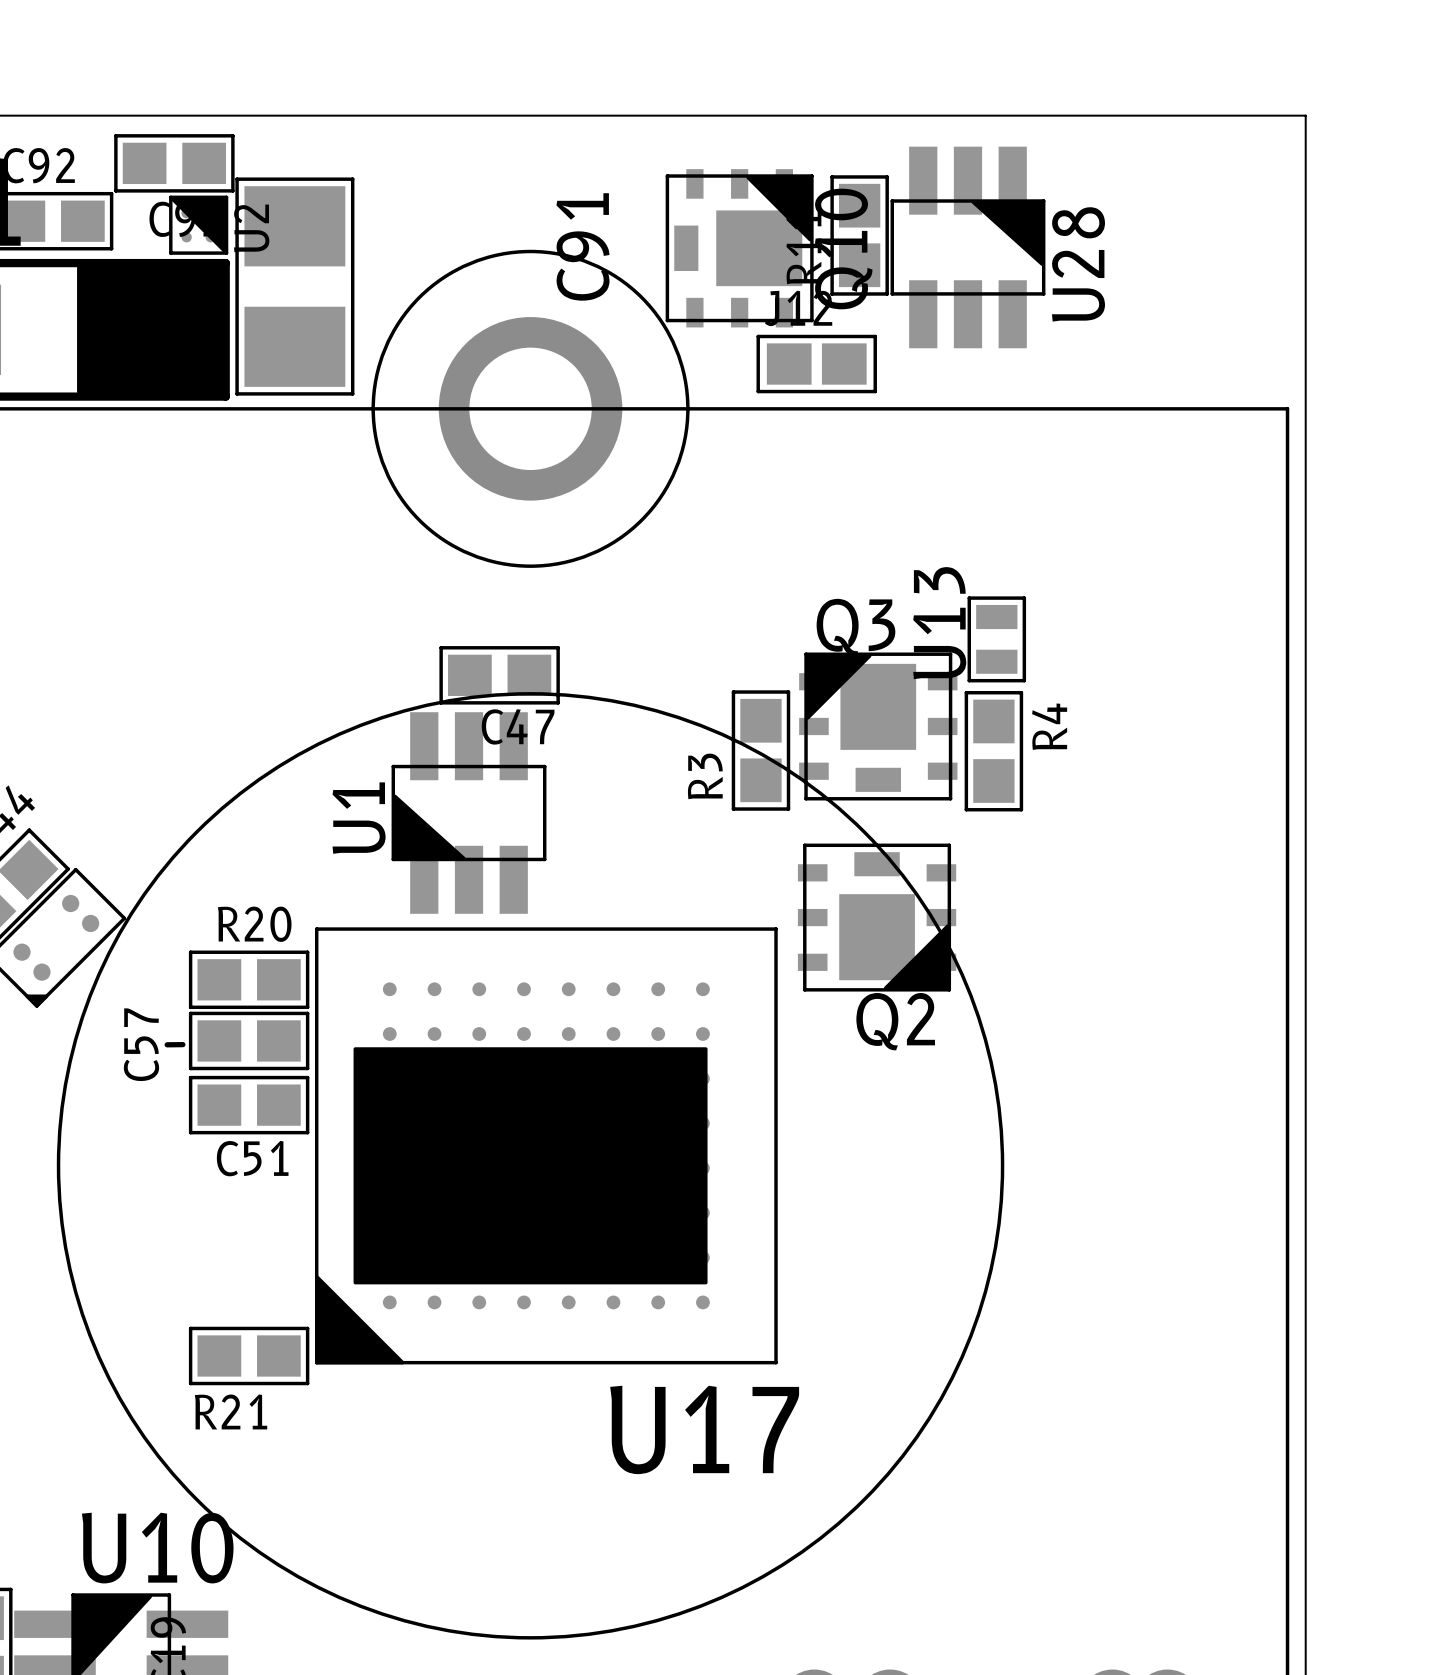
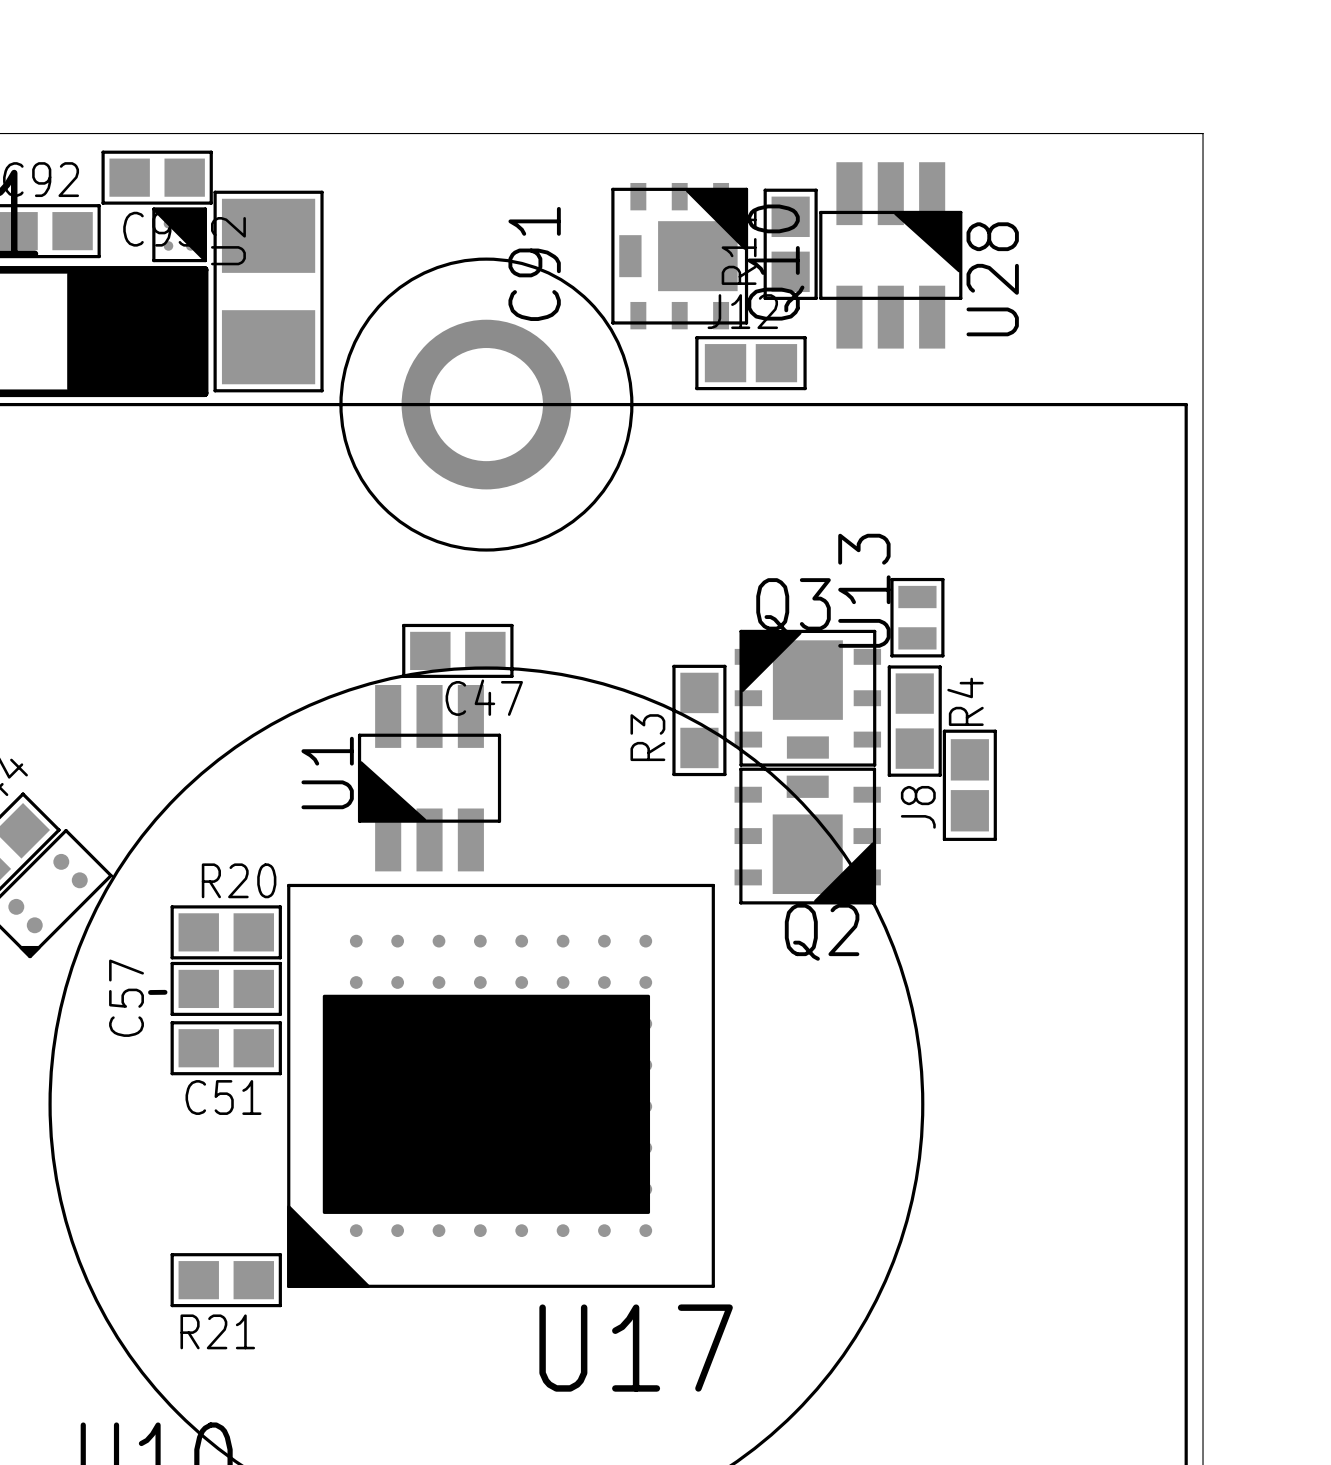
J8: none -> (969, 785)
Q2 position: (877, 917) -> (807, 836)

